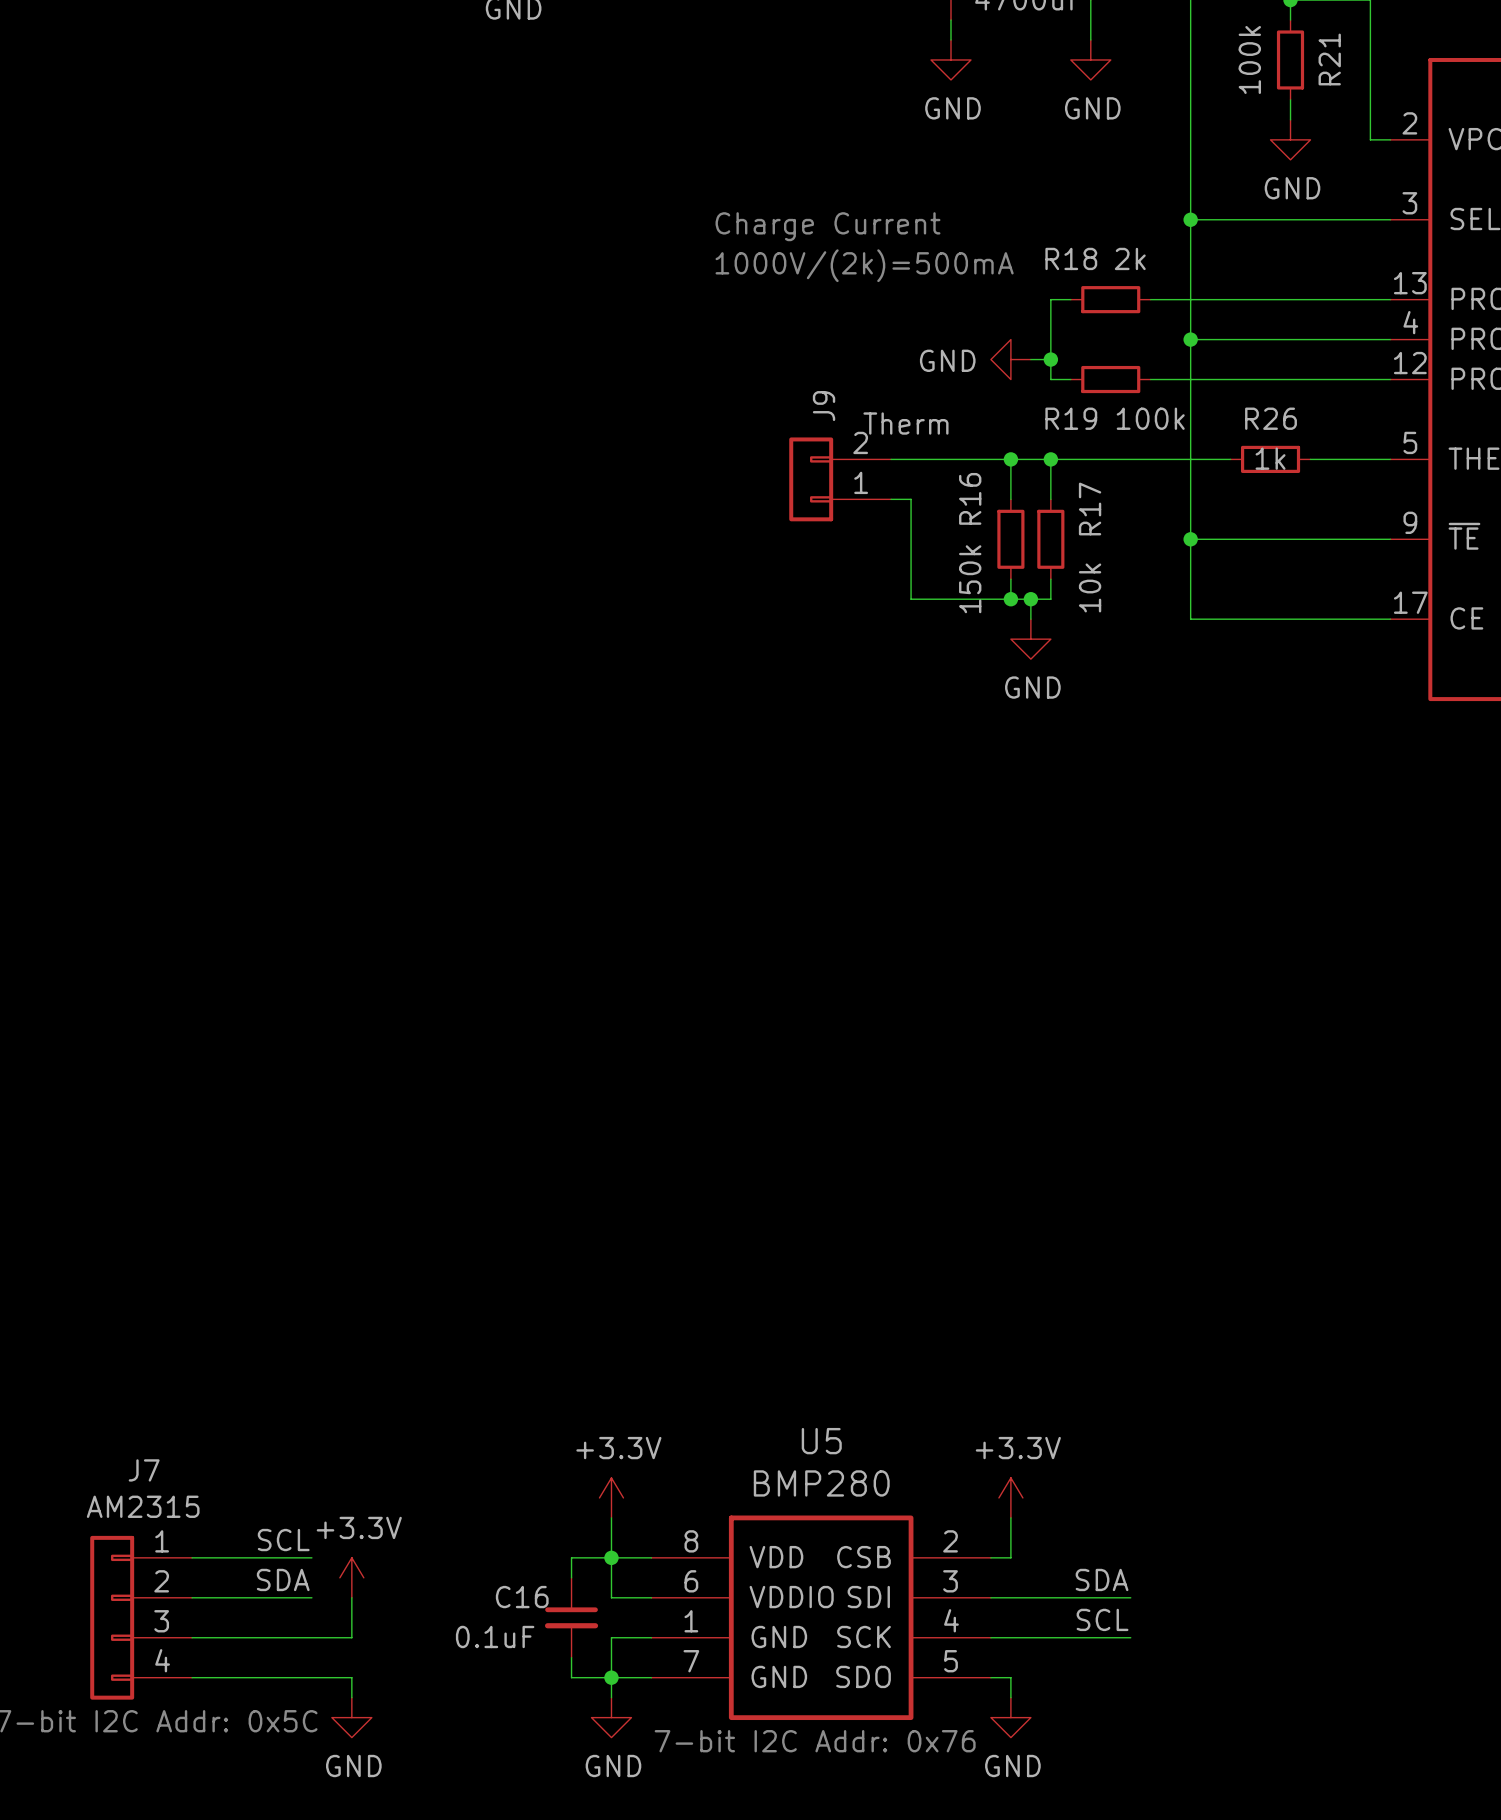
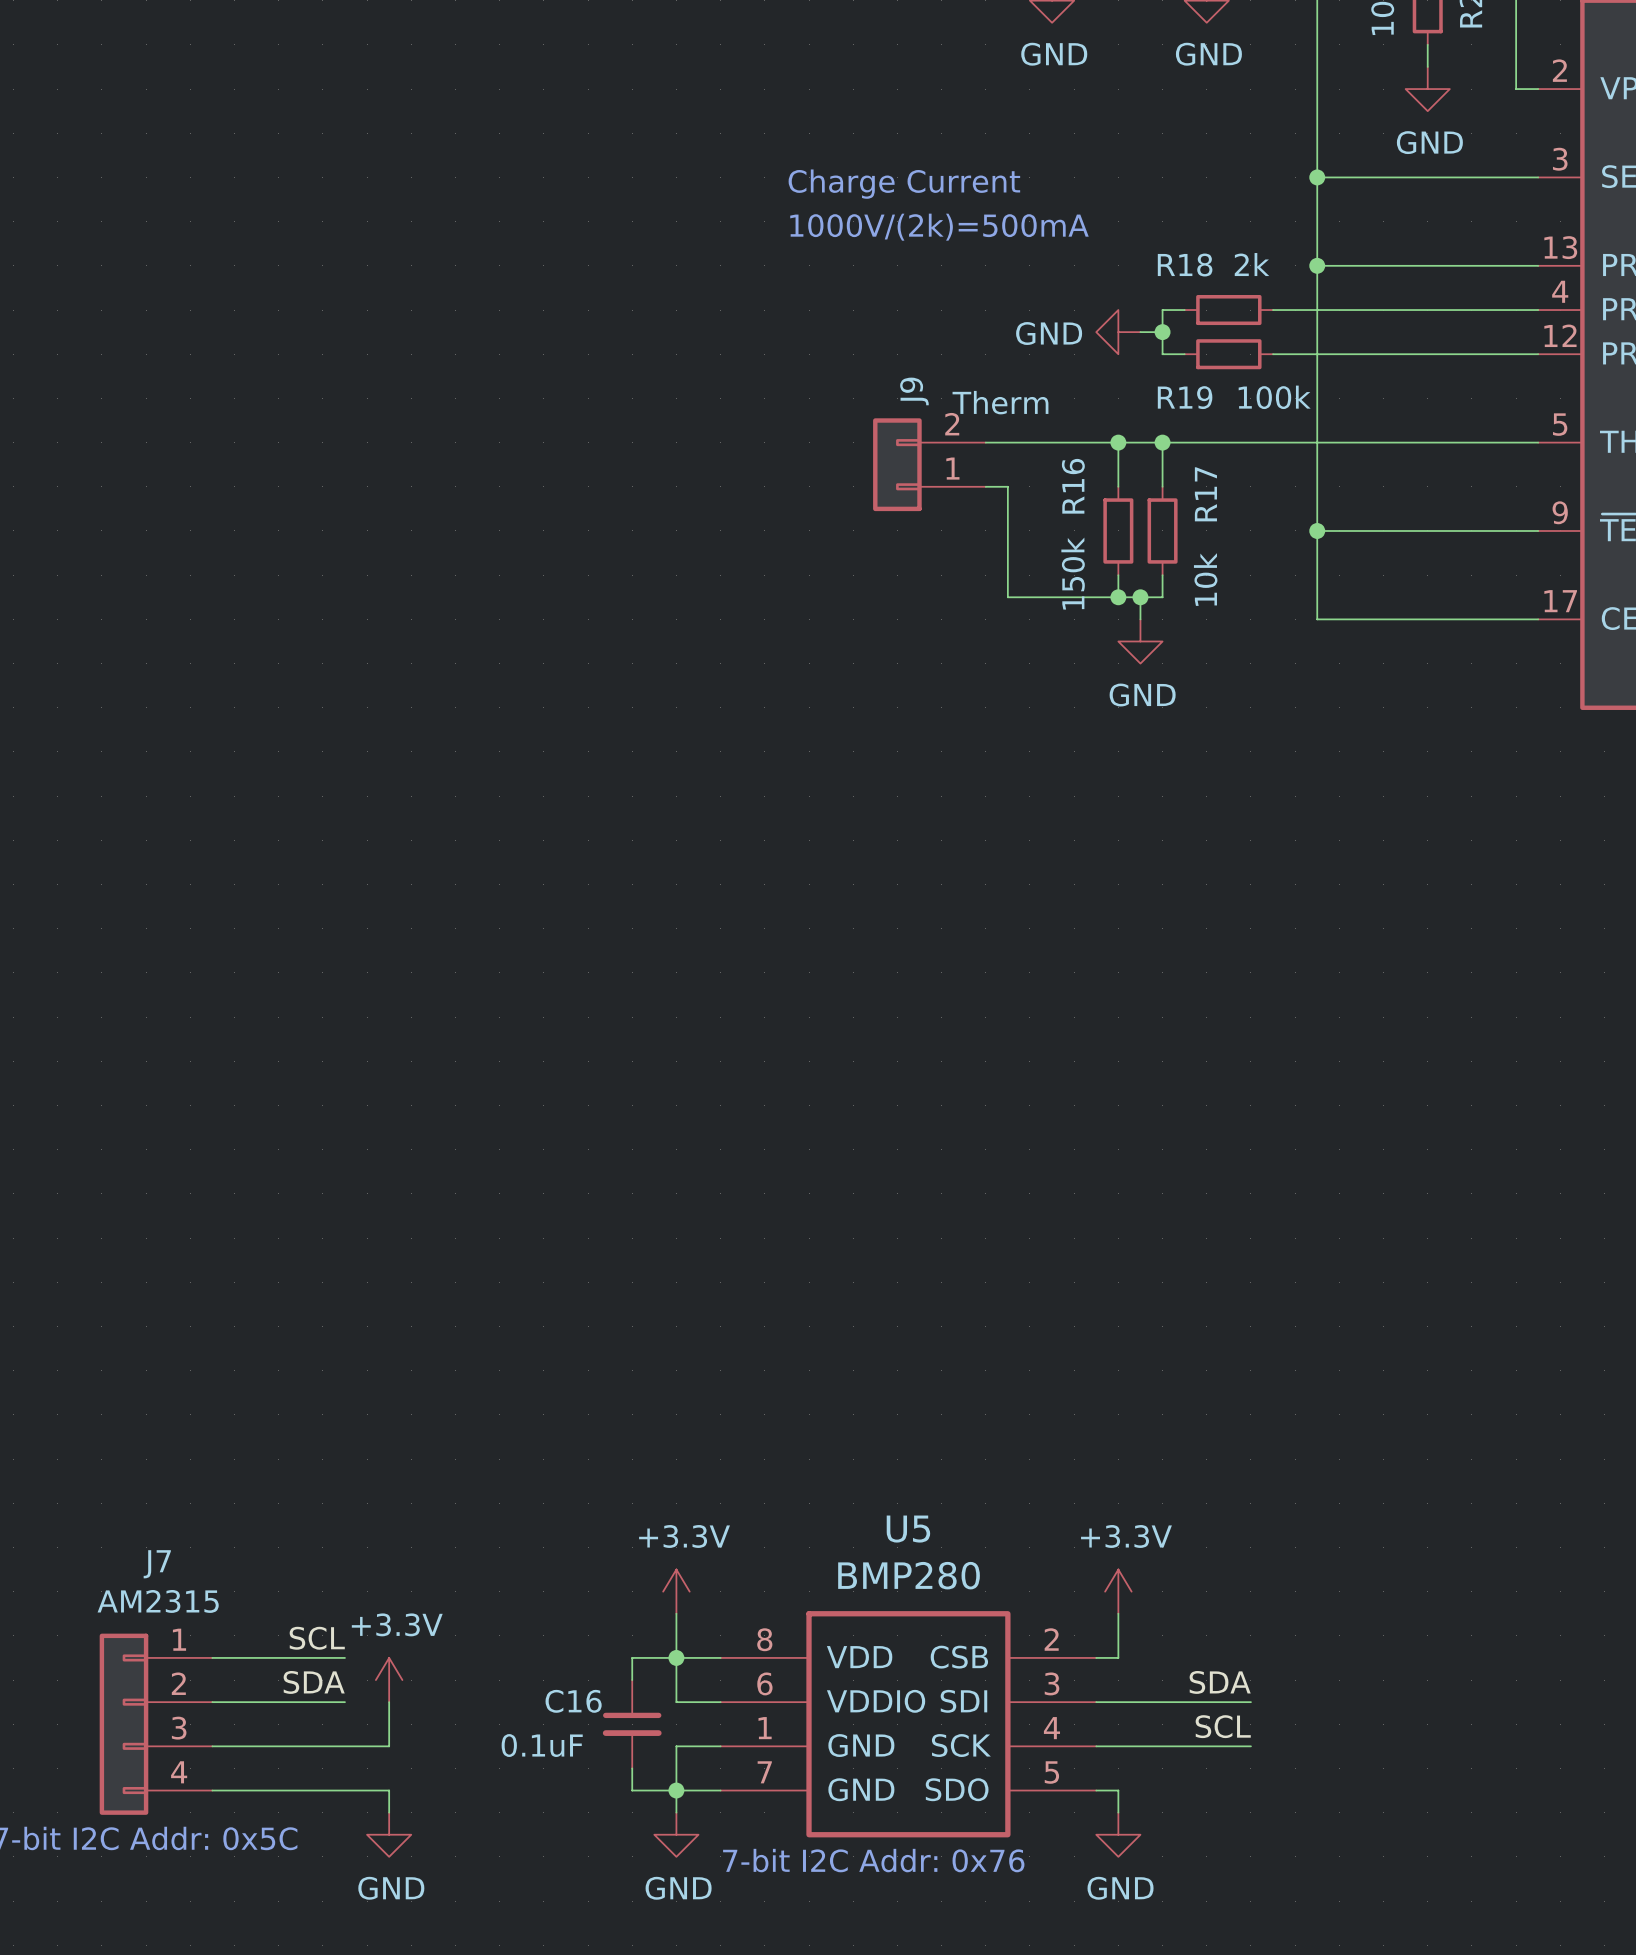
wire: (1070, 299) (1050, 299) (1050, 339) -> (1184, 310) (1162, 310)
R18 position: (1110, 299) -> (1228, 310)
wire: (1150, 299) (1190, 299) -> (1273, 310) (1317, 310)
junction position: (1190, 339) -> (1317, 265)
wire: none -> (1361, 442) (1449, 442)
R26: 1k (1270, 459) -> none

